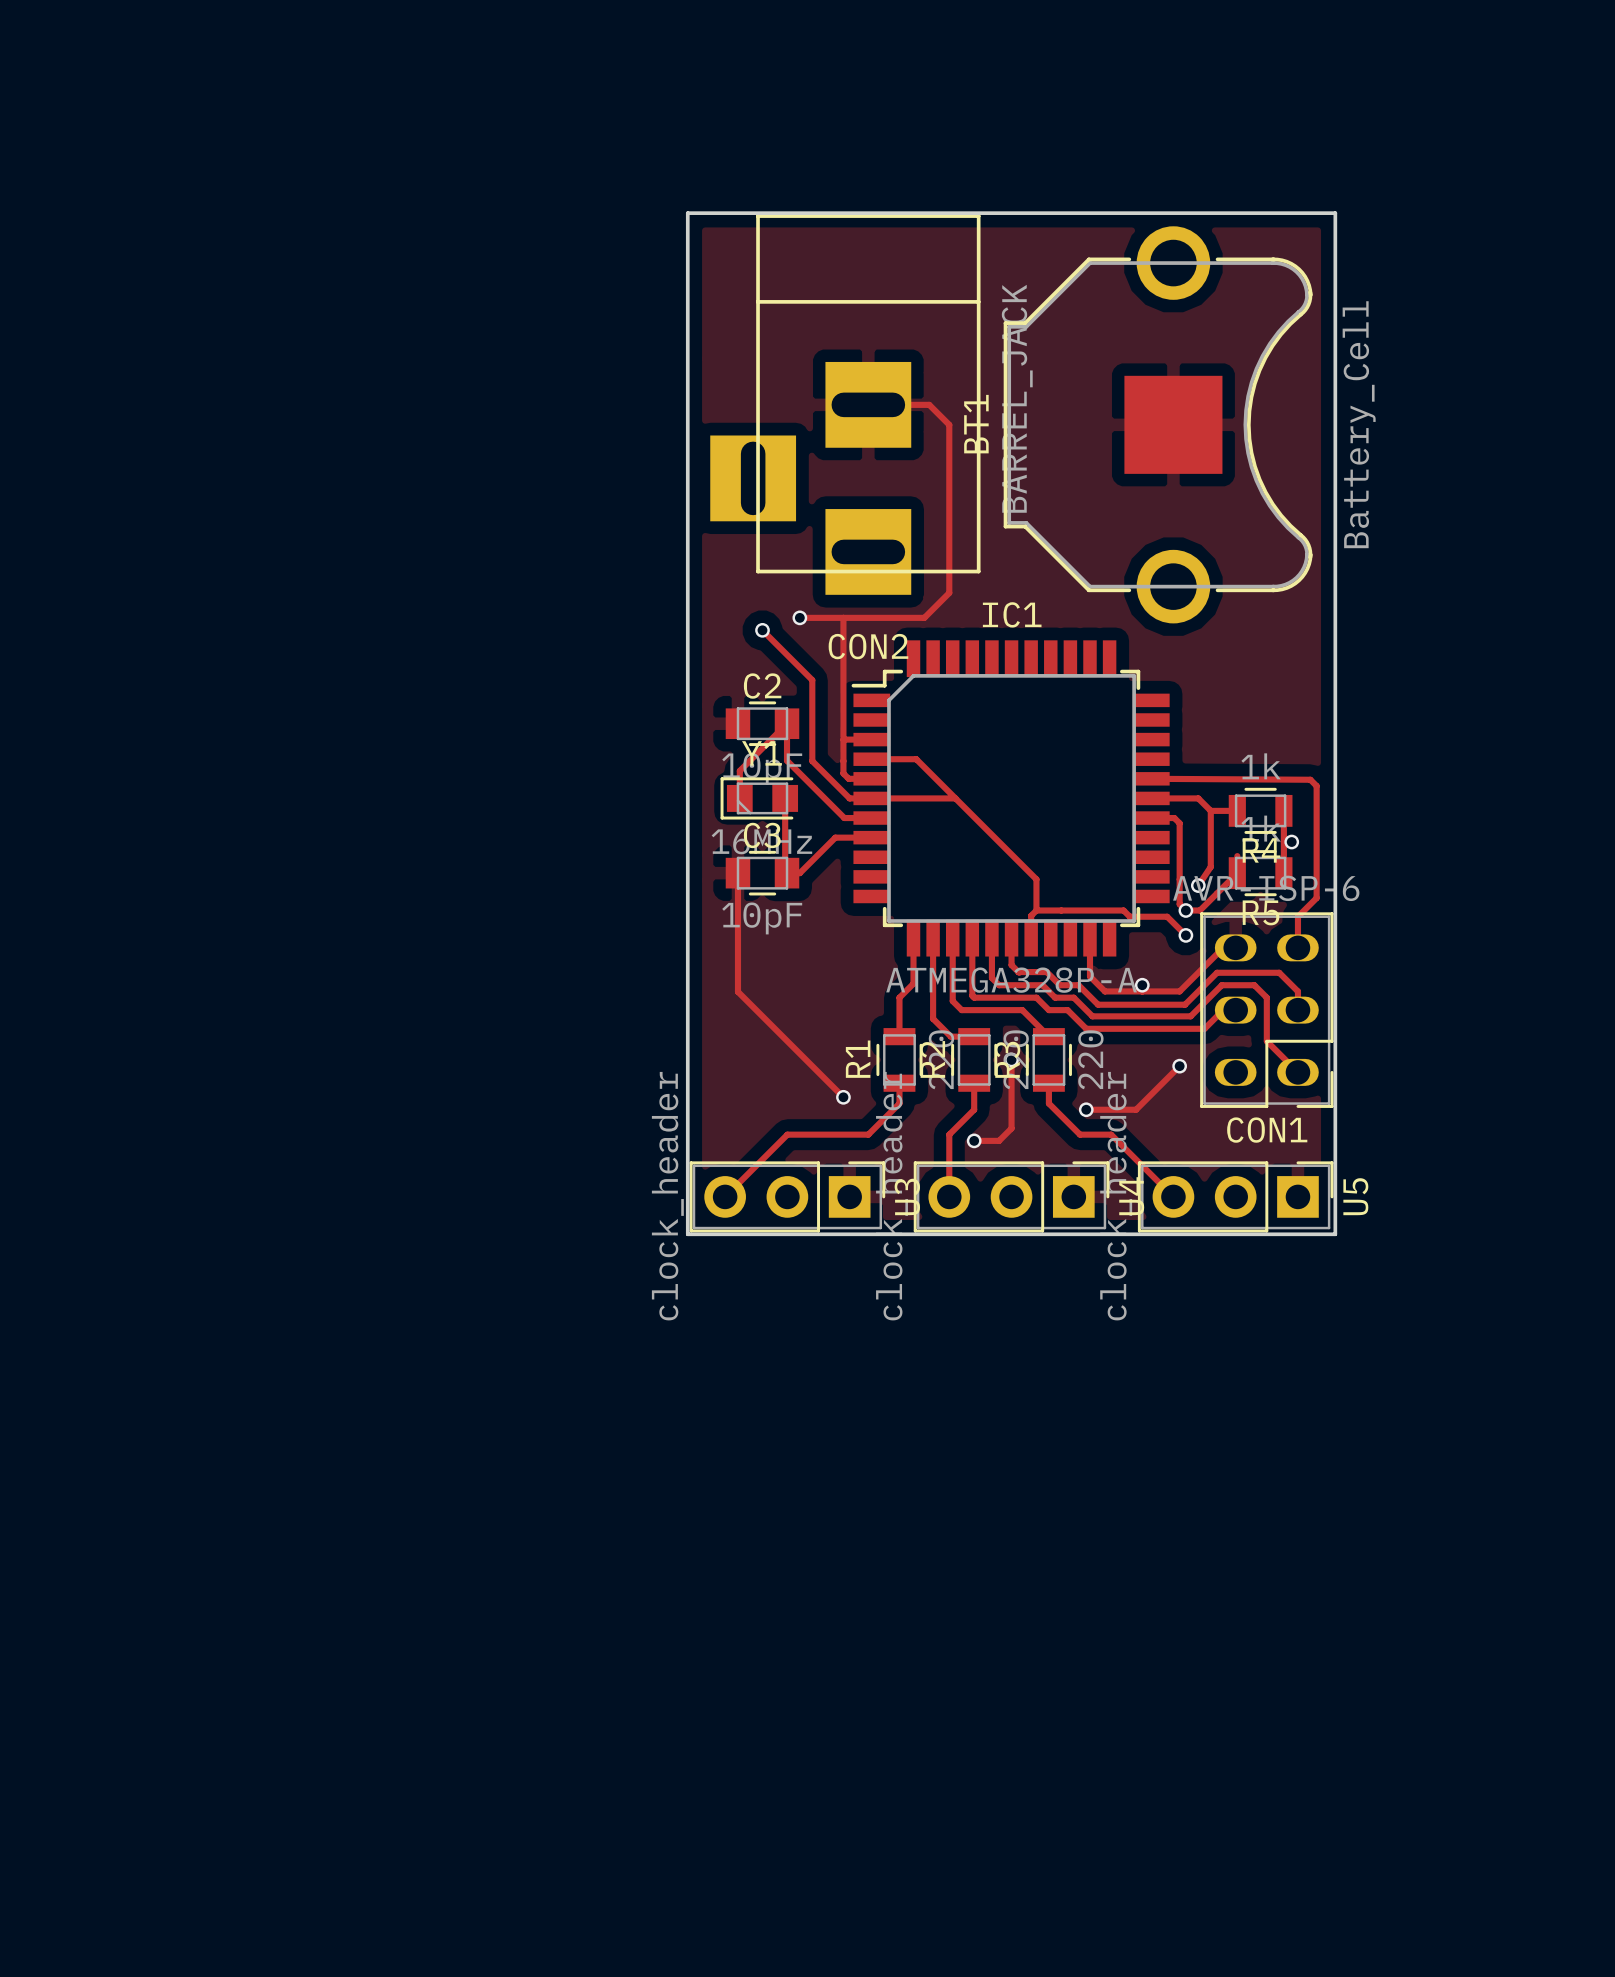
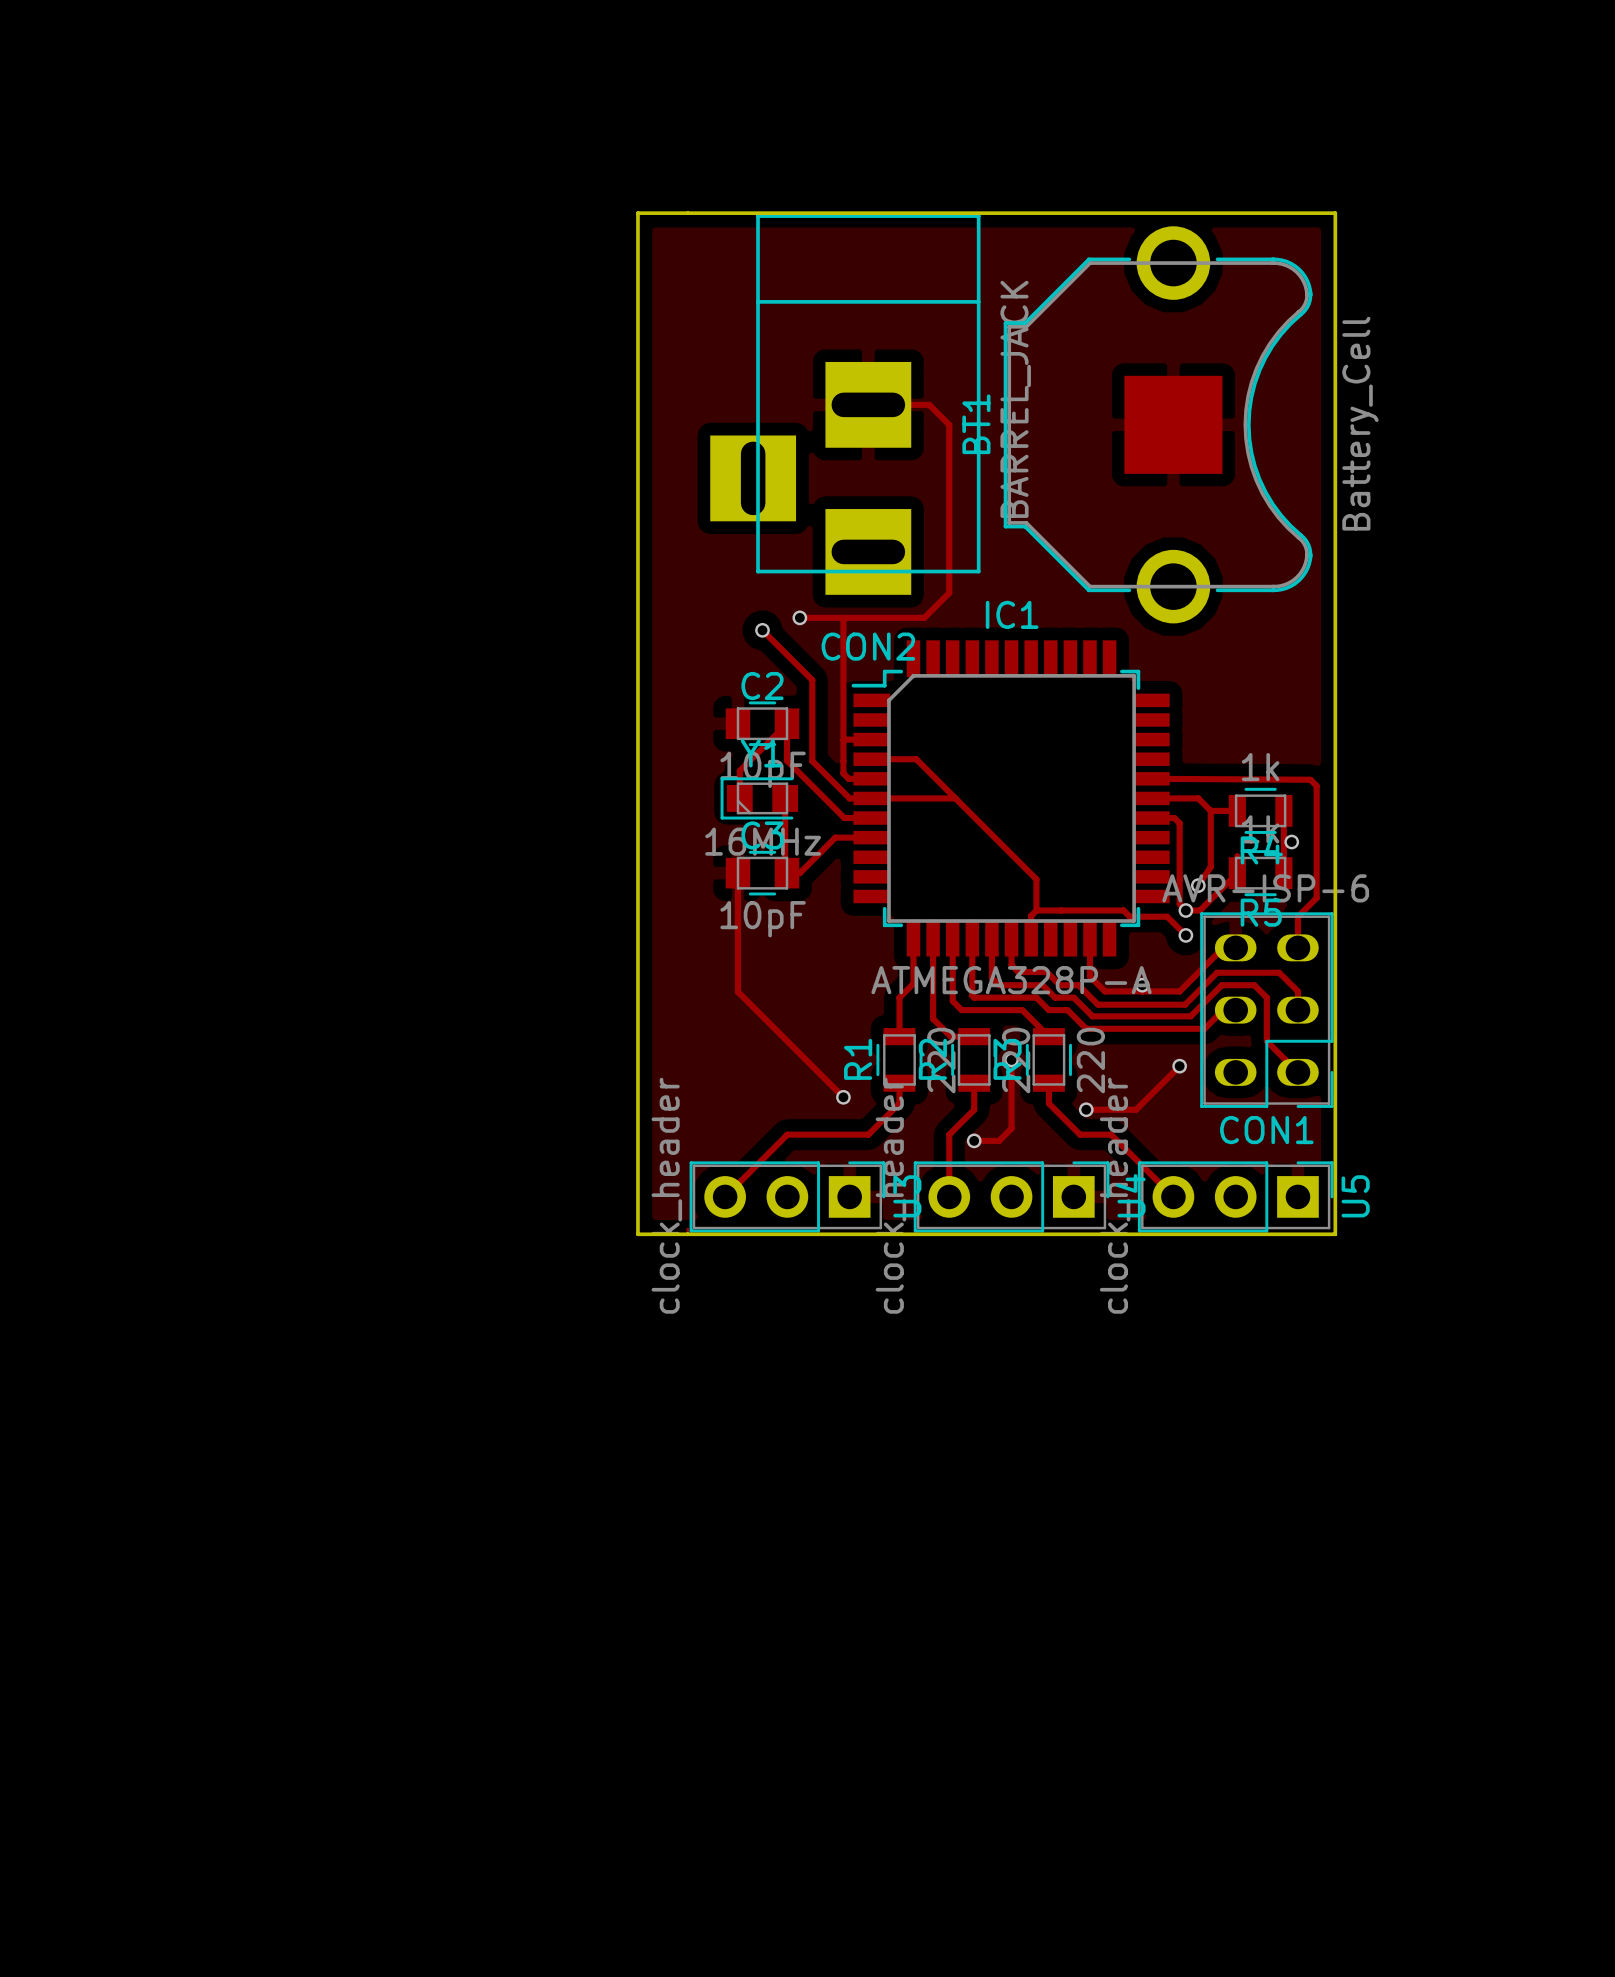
board edge: (687, 213) (687, 1234) -> (687, 213) (637, 213) (637, 1234) (687, 1234)

